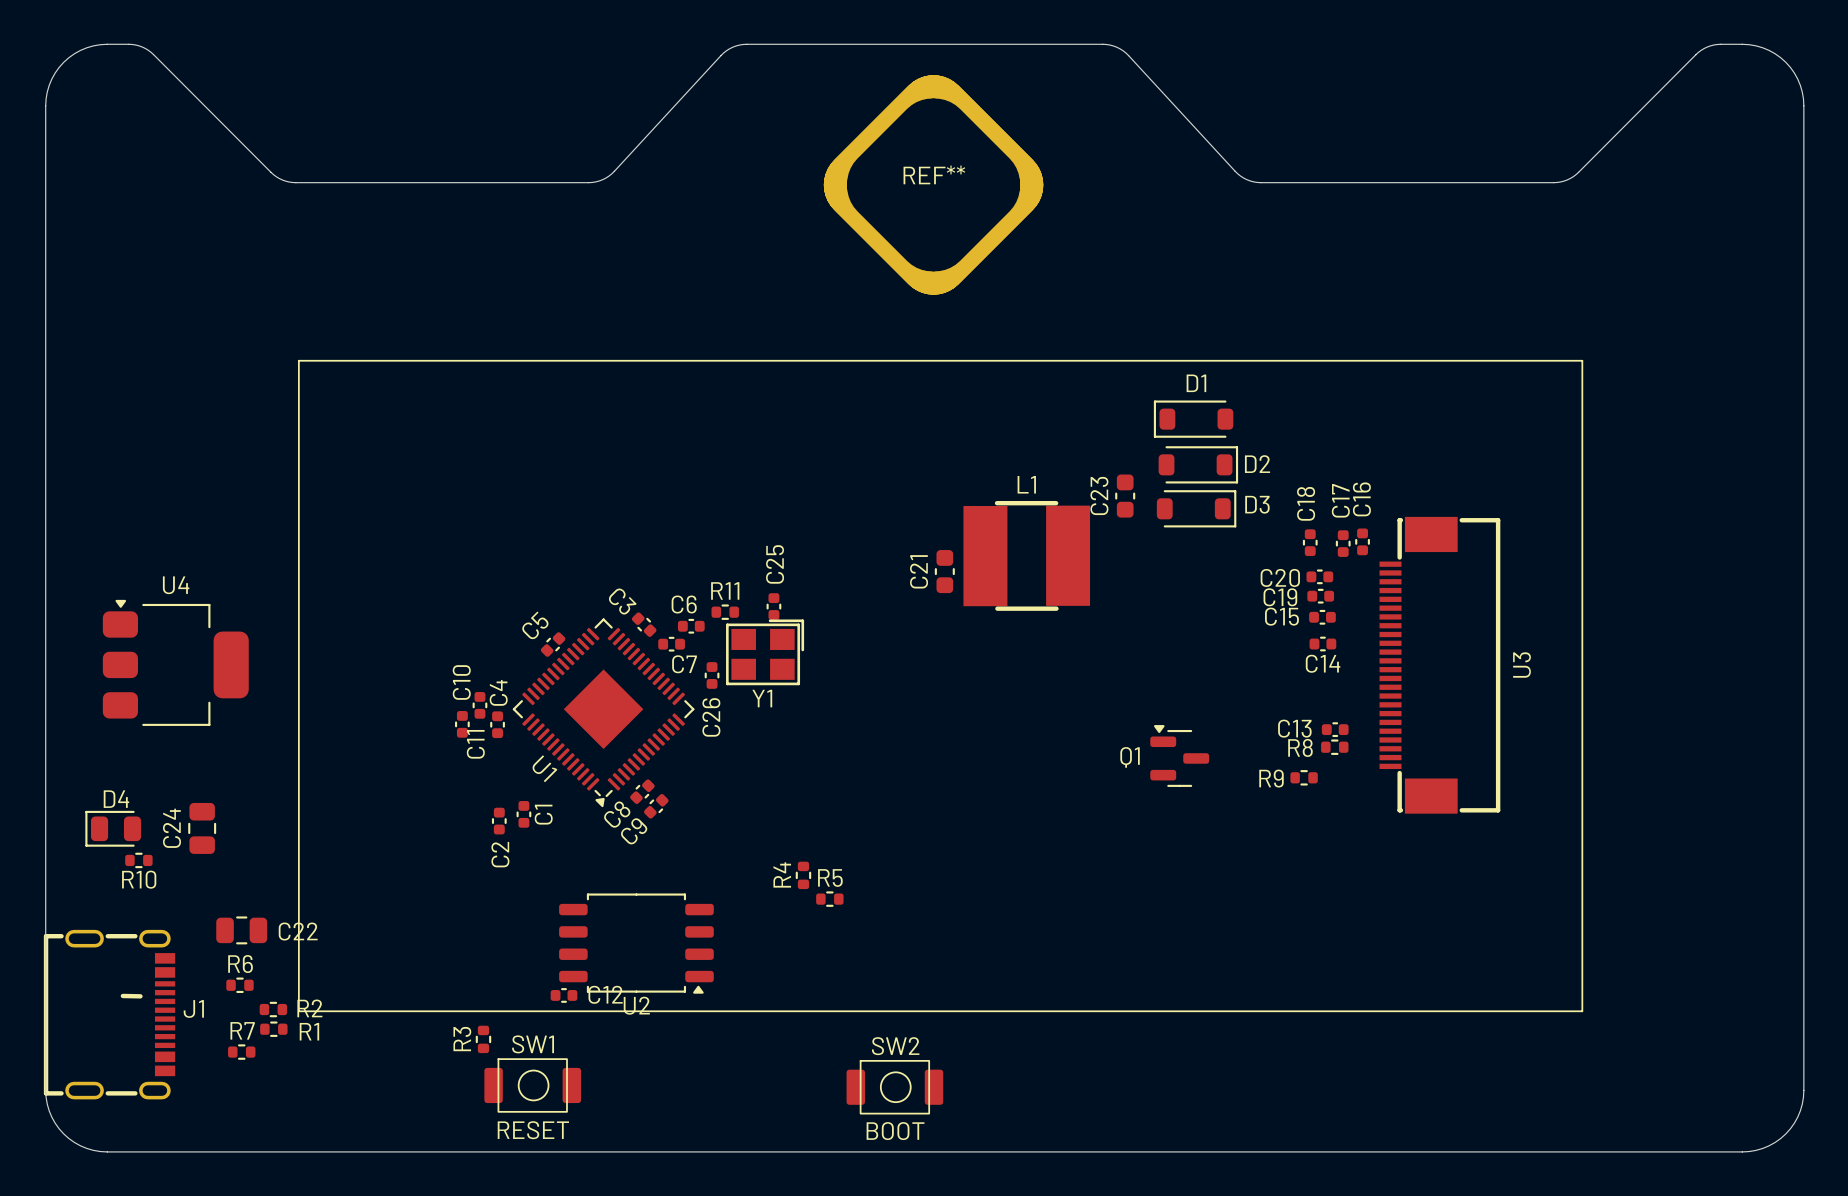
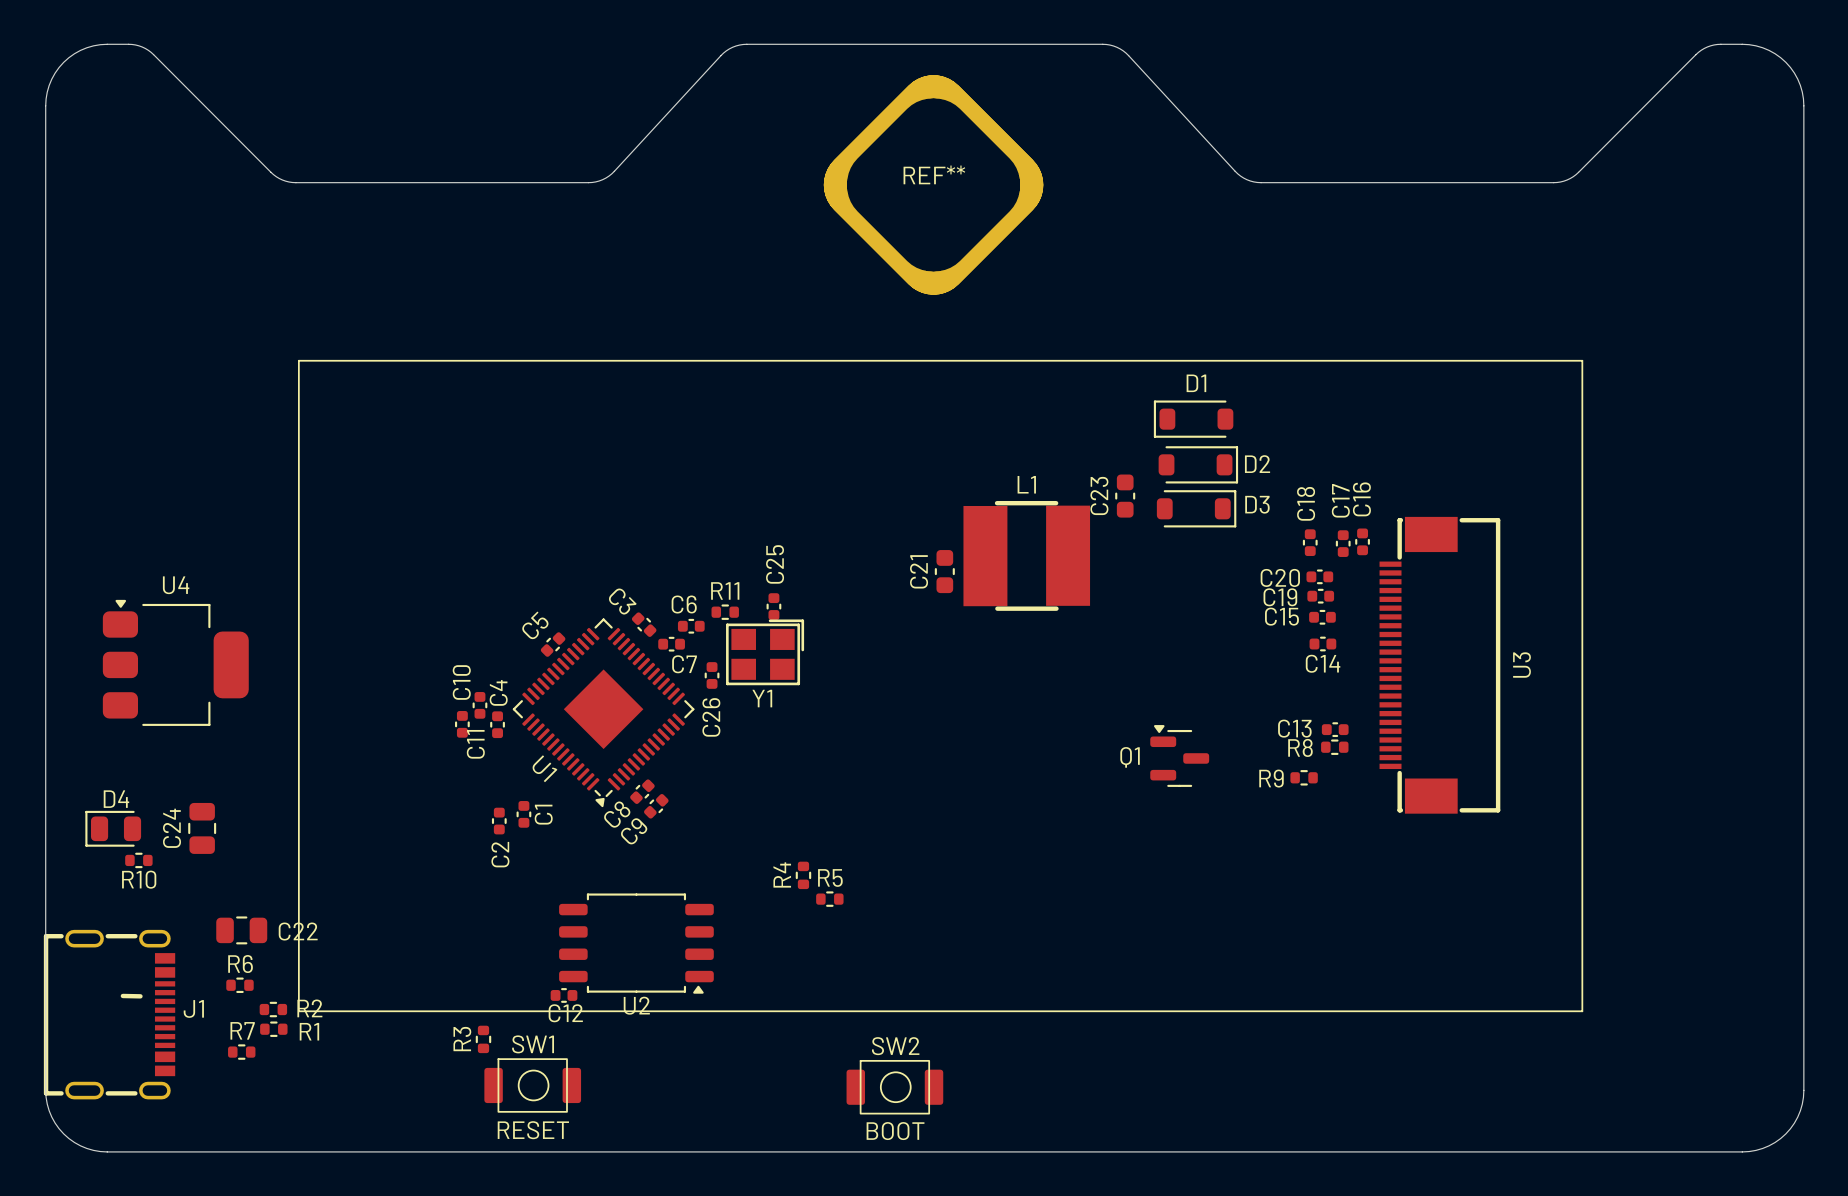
C12 name position: C12 (605, 994) -> C12 (565, 1013)

